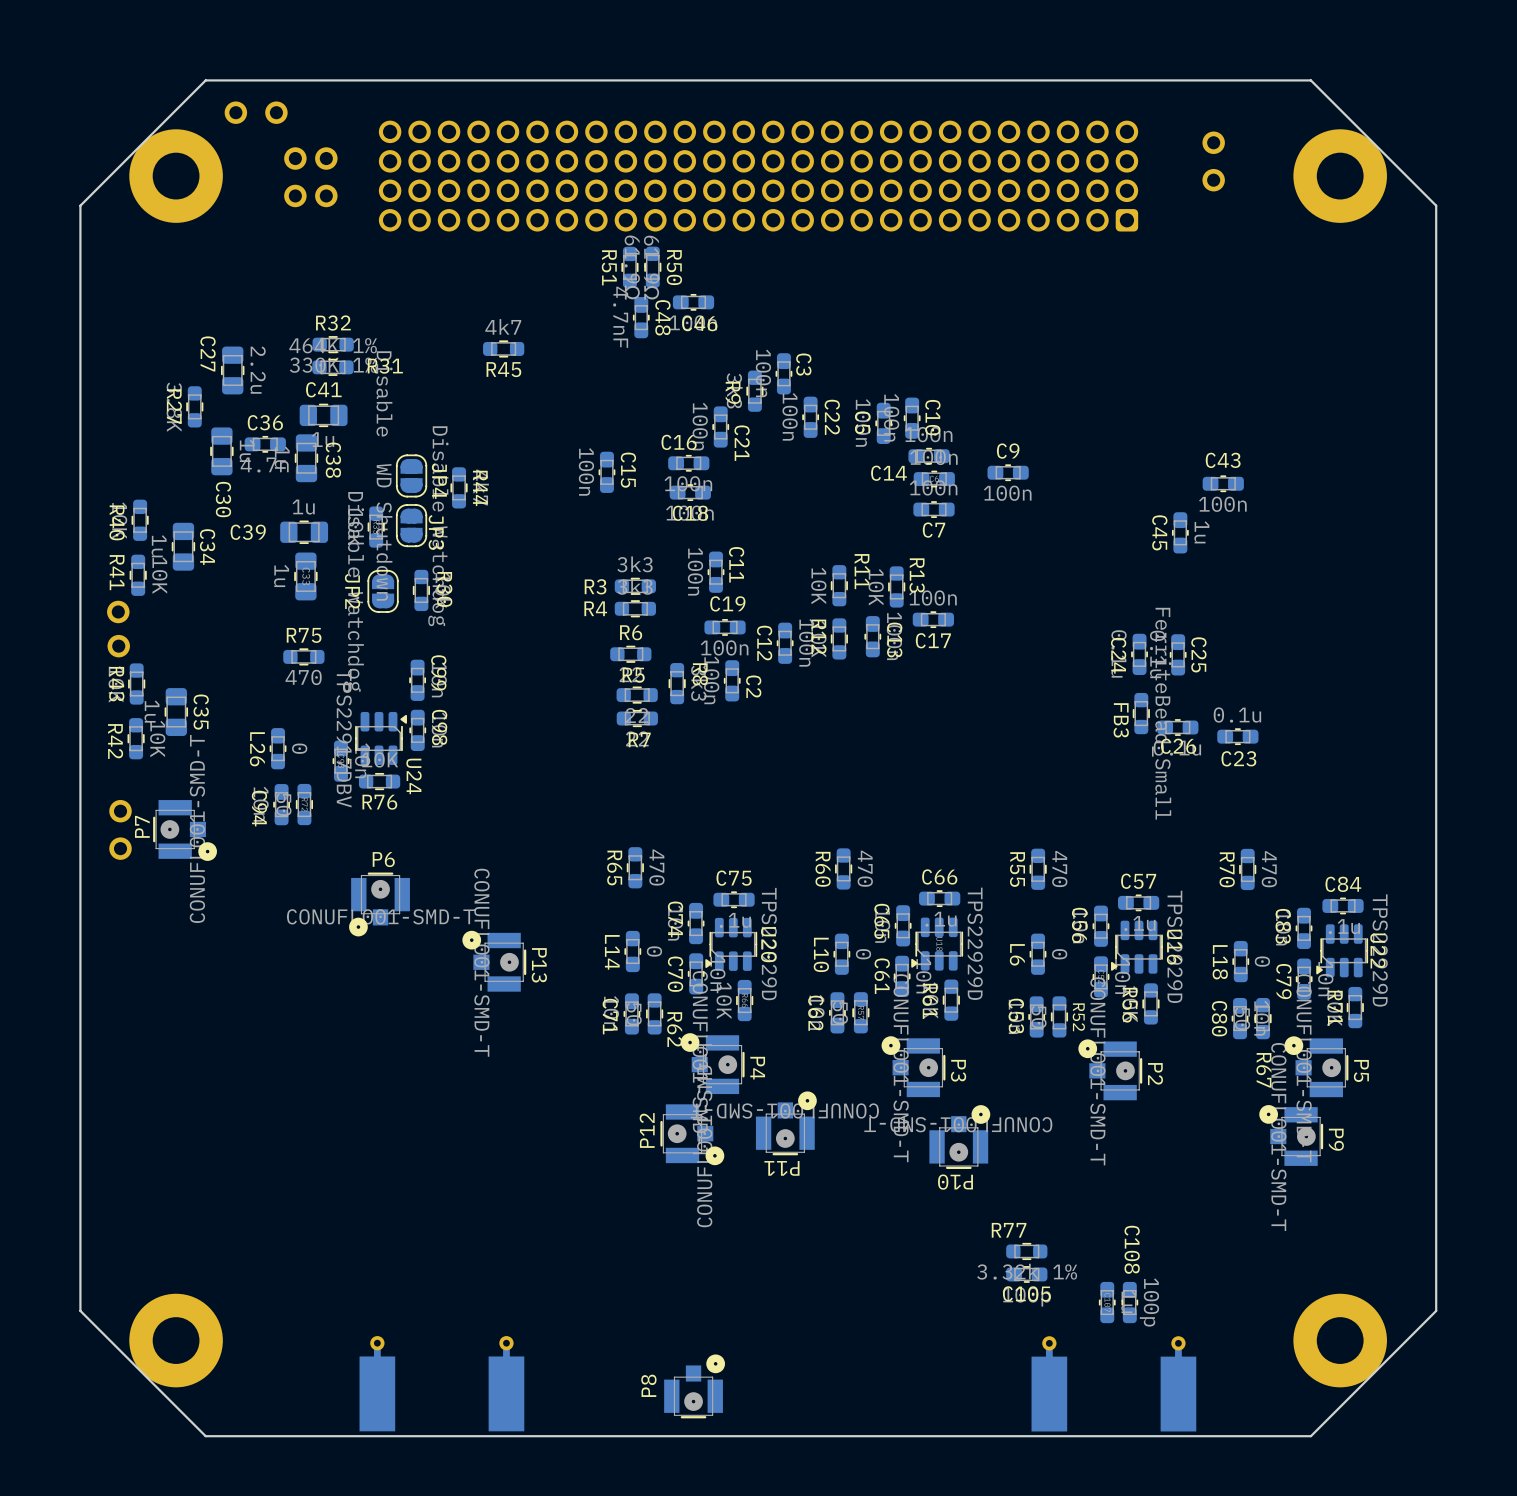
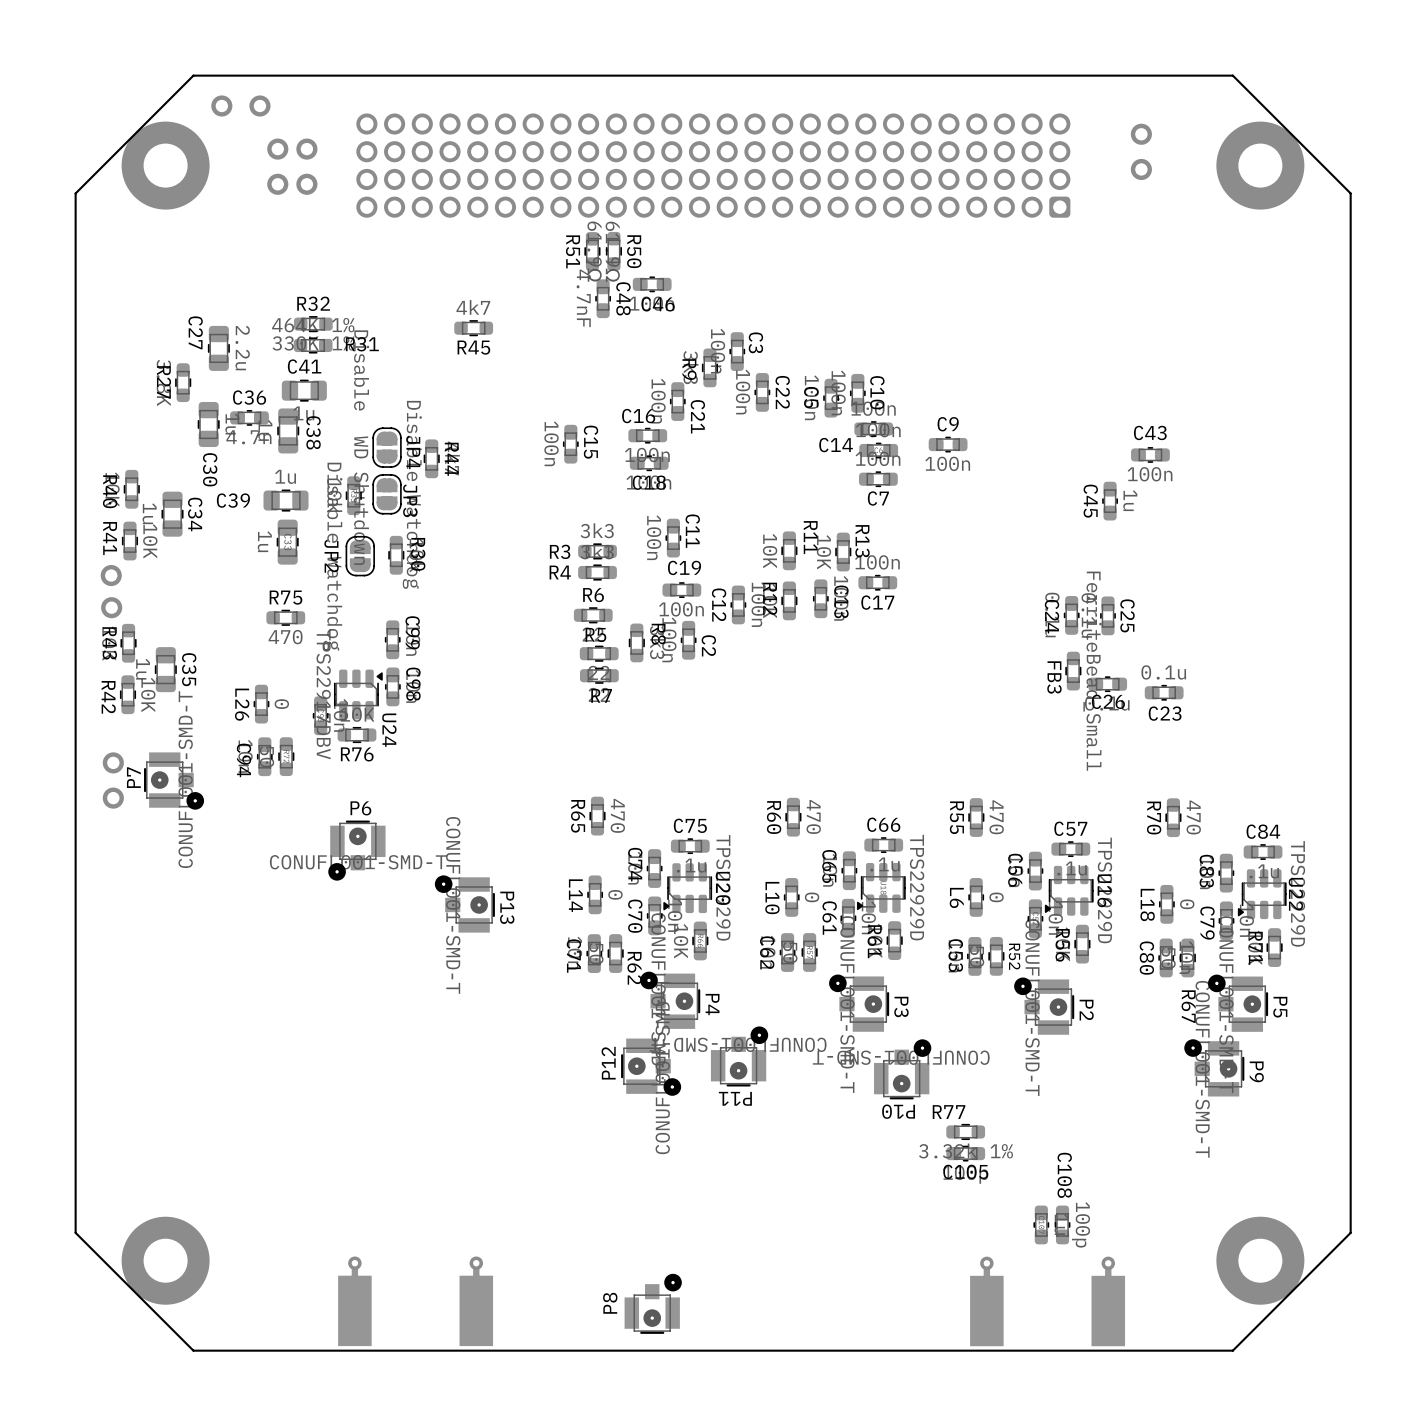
R77 position: (1026, 1251) -> (965, 1131)
C105 position: (1026, 1274) -> (965, 1153)

